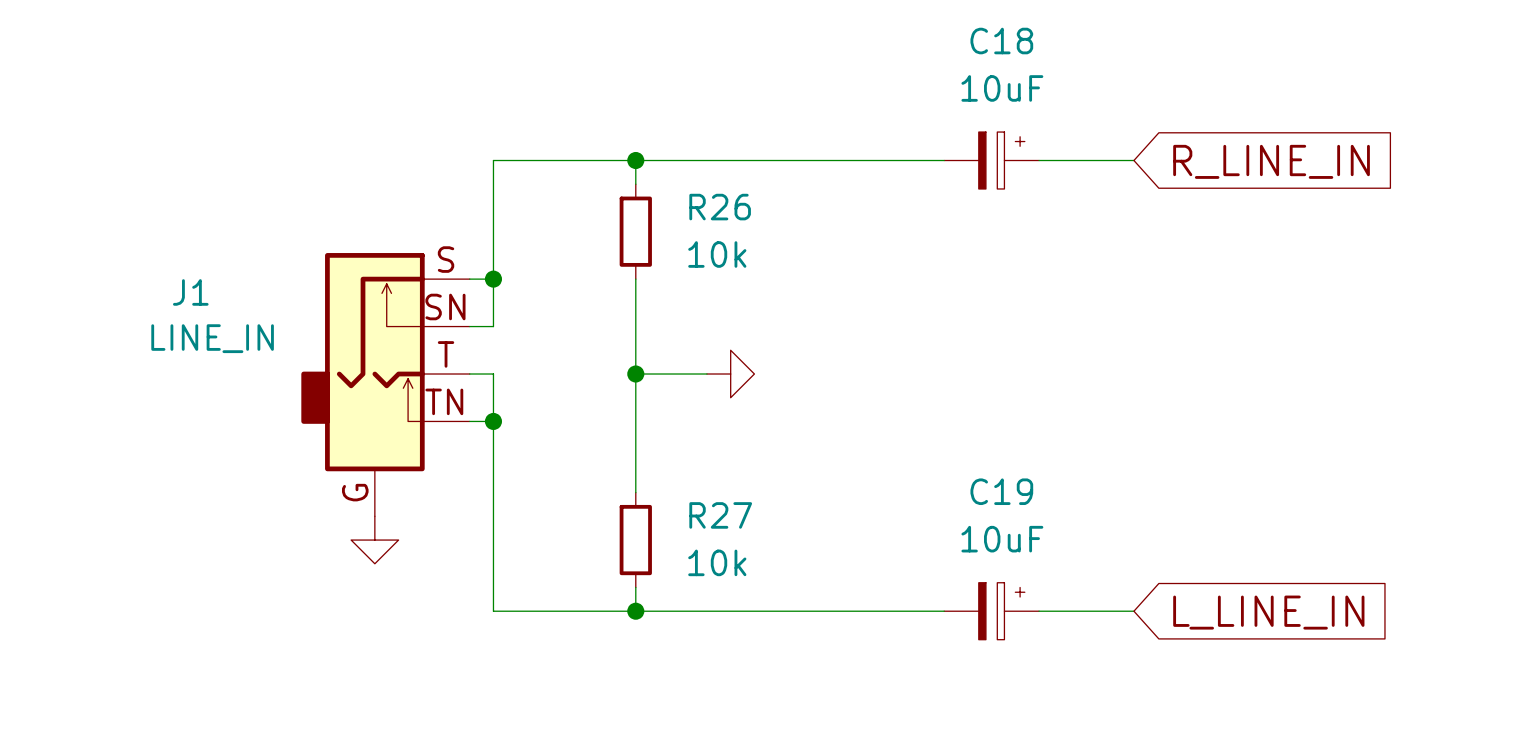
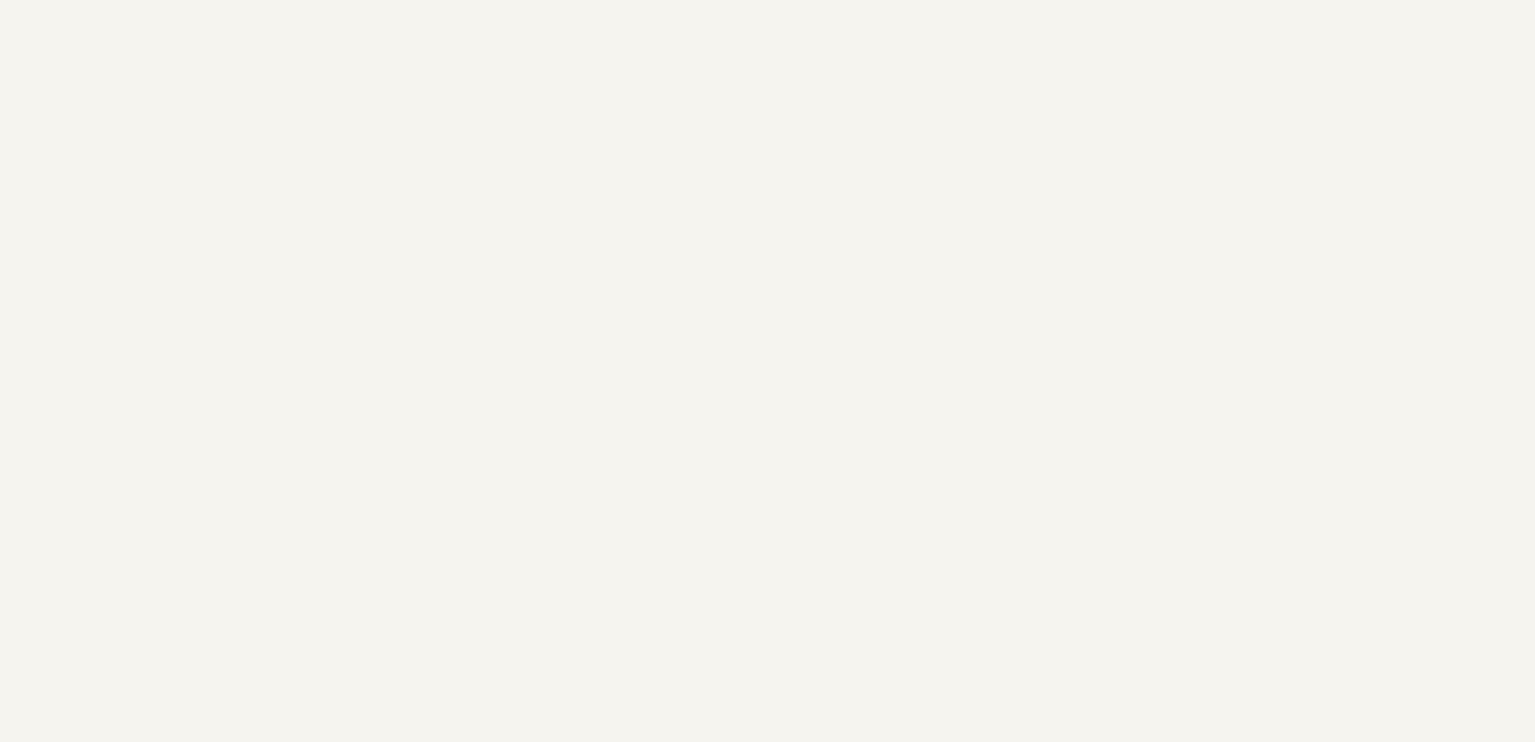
wire: (635, 160) (635, 184) -> none
junction: (635, 160) -> none
wire: (944, 160) (493, 160) (493, 326) (469, 326) -> none
C18: 10uF (991, 160) -> none
wire: (1039, 160) (1133, 160) -> none
global label: R_LINE_IN (1271, 161) -> none
R26: 10k (635, 231) -> none
wire: (469, 279) (493, 279) -> none
junction: (493, 279) -> none
wire: (635, 279) (635, 492) -> none
wire: (469, 374) (493, 374) (493, 611) (944, 611) -> none
wire: (635, 374) (706, 374) -> none
junction: (635, 374) -> none
power symbol: (730, 374) -> none
J1: LINE_IN (385, 384) -> none
wire: (469, 421) (493, 421) -> none
junction: (493, 421) -> none
power symbol: (374, 540) -> none
R27: 10k (635, 540) -> none
wire: (635, 587) (635, 611) -> none
junction: (635, 611) -> none
C19: 10uF (991, 611) -> none
wire: (1039, 611) (1133, 611) -> none
global label: L_LINE_IN (1268, 612) -> none

